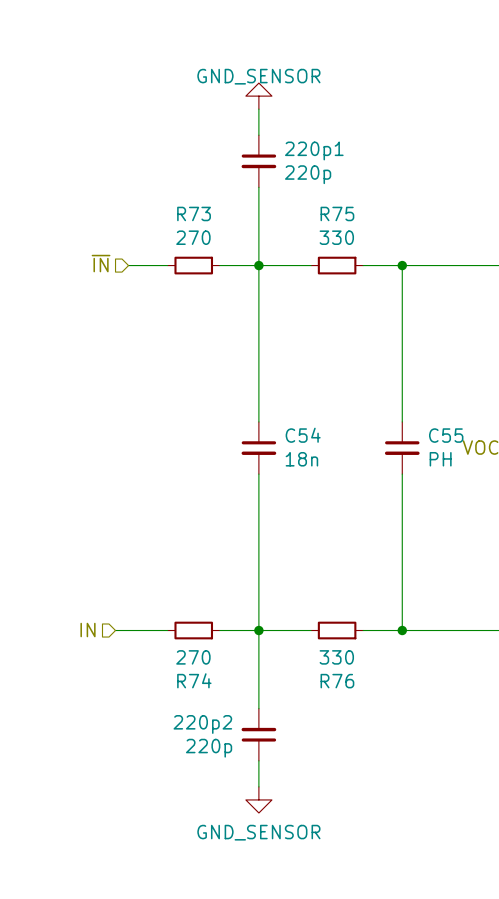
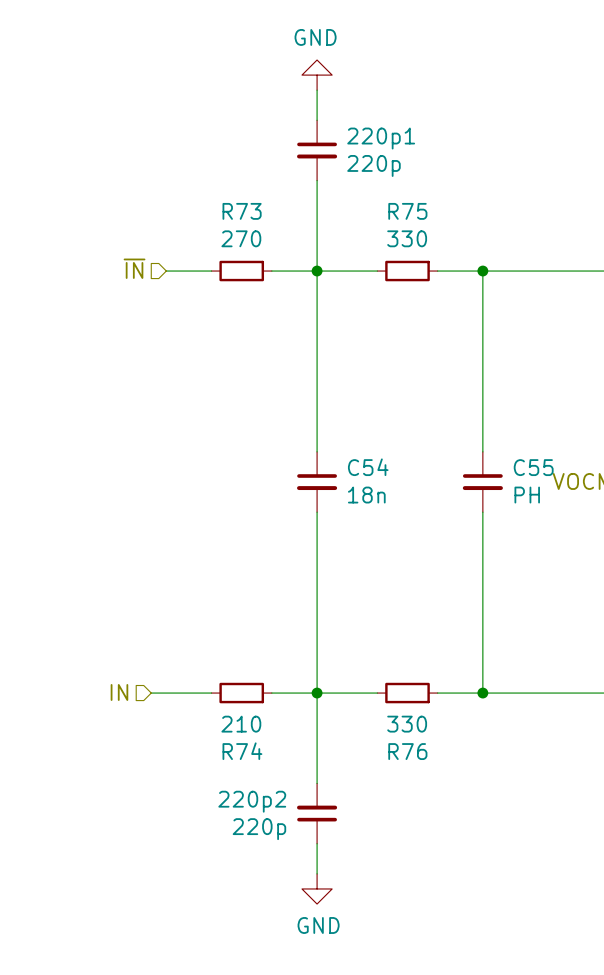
power symbol: GND_SENSOR (258, 96) -> GND (317, 75)
R74 value: 270 (193, 657) -> 210 (241, 724)
power symbol: GND_SENSOR (258, 799) -> GND (317, 888)

